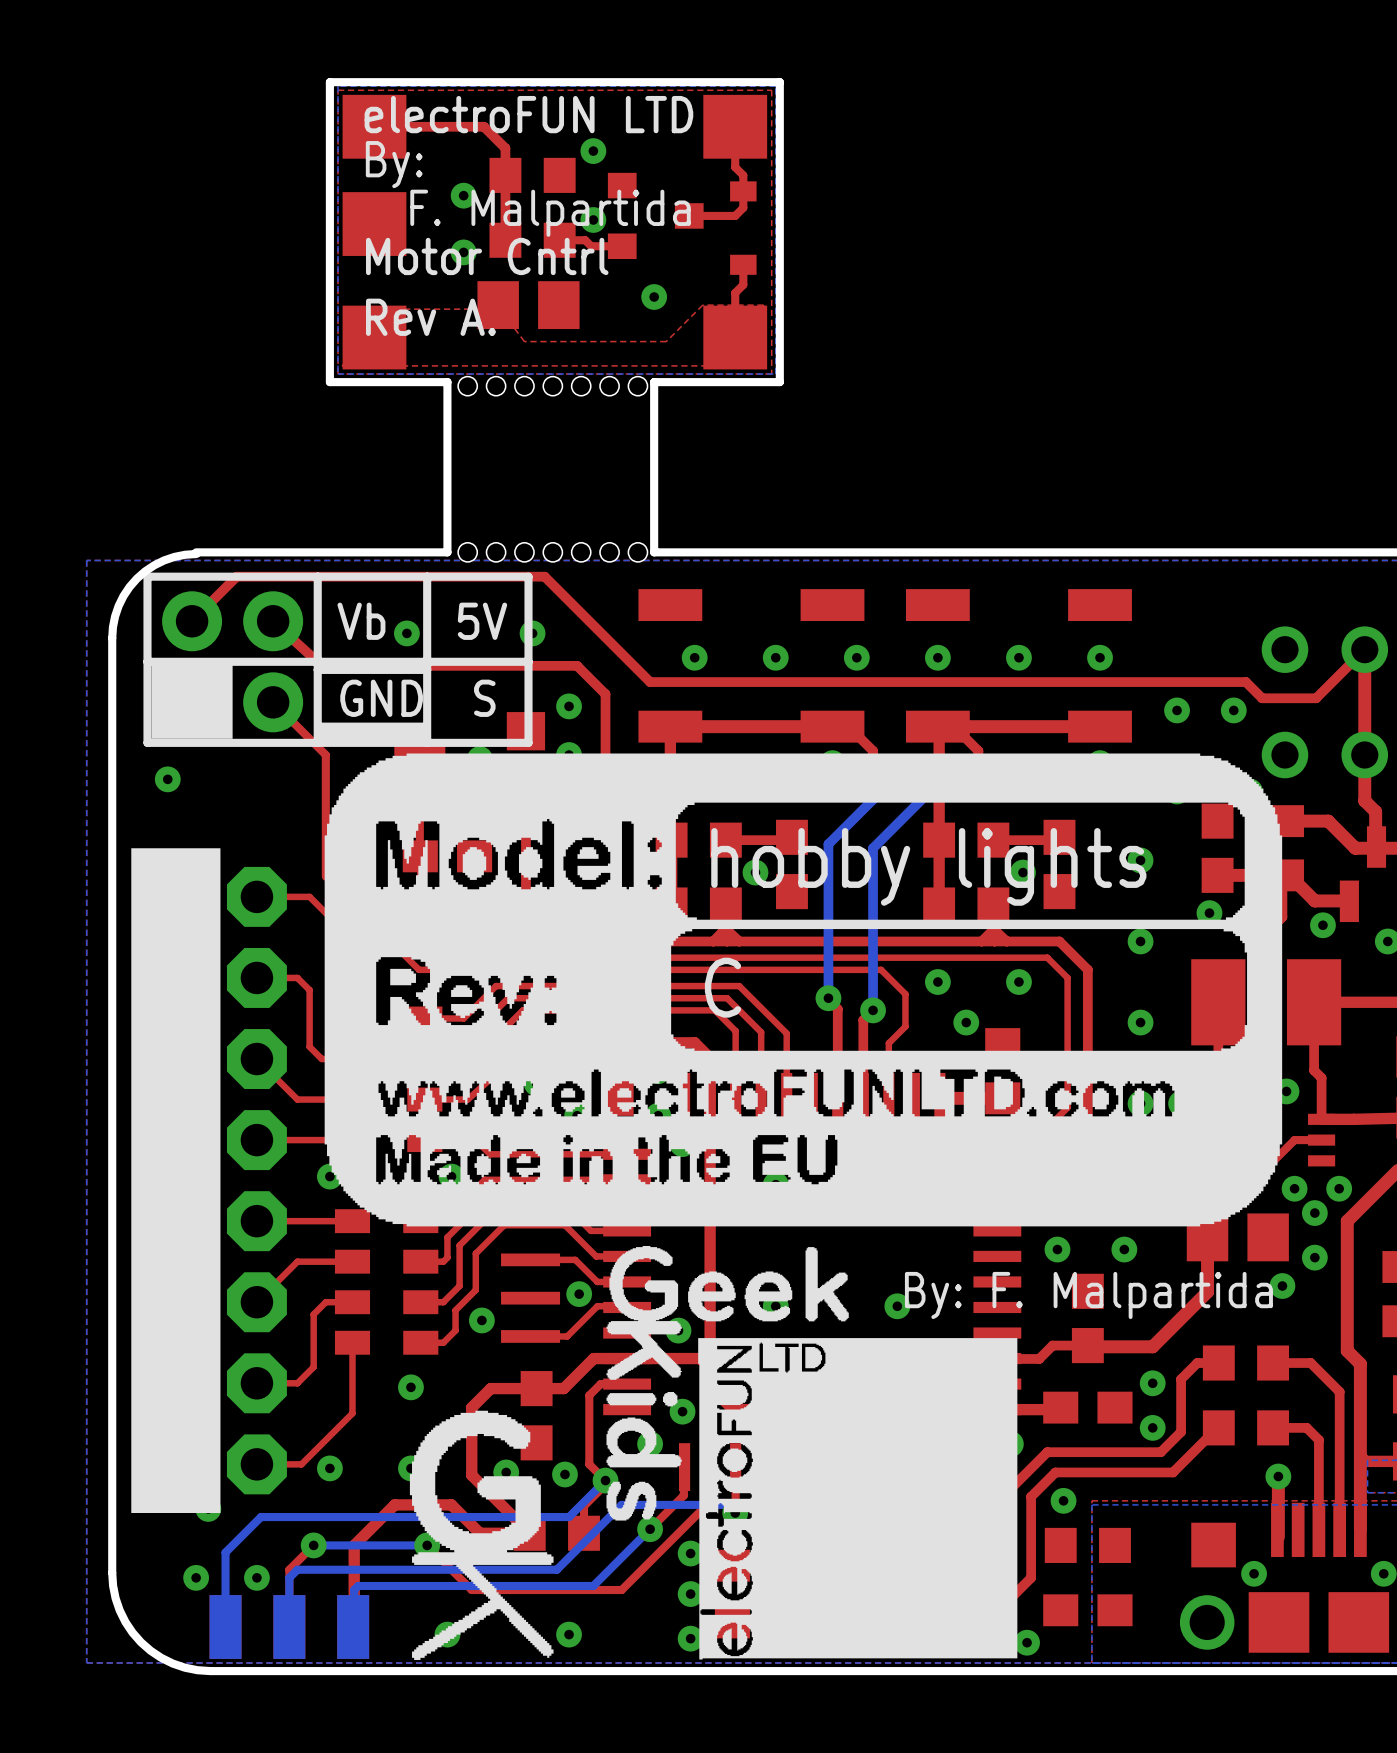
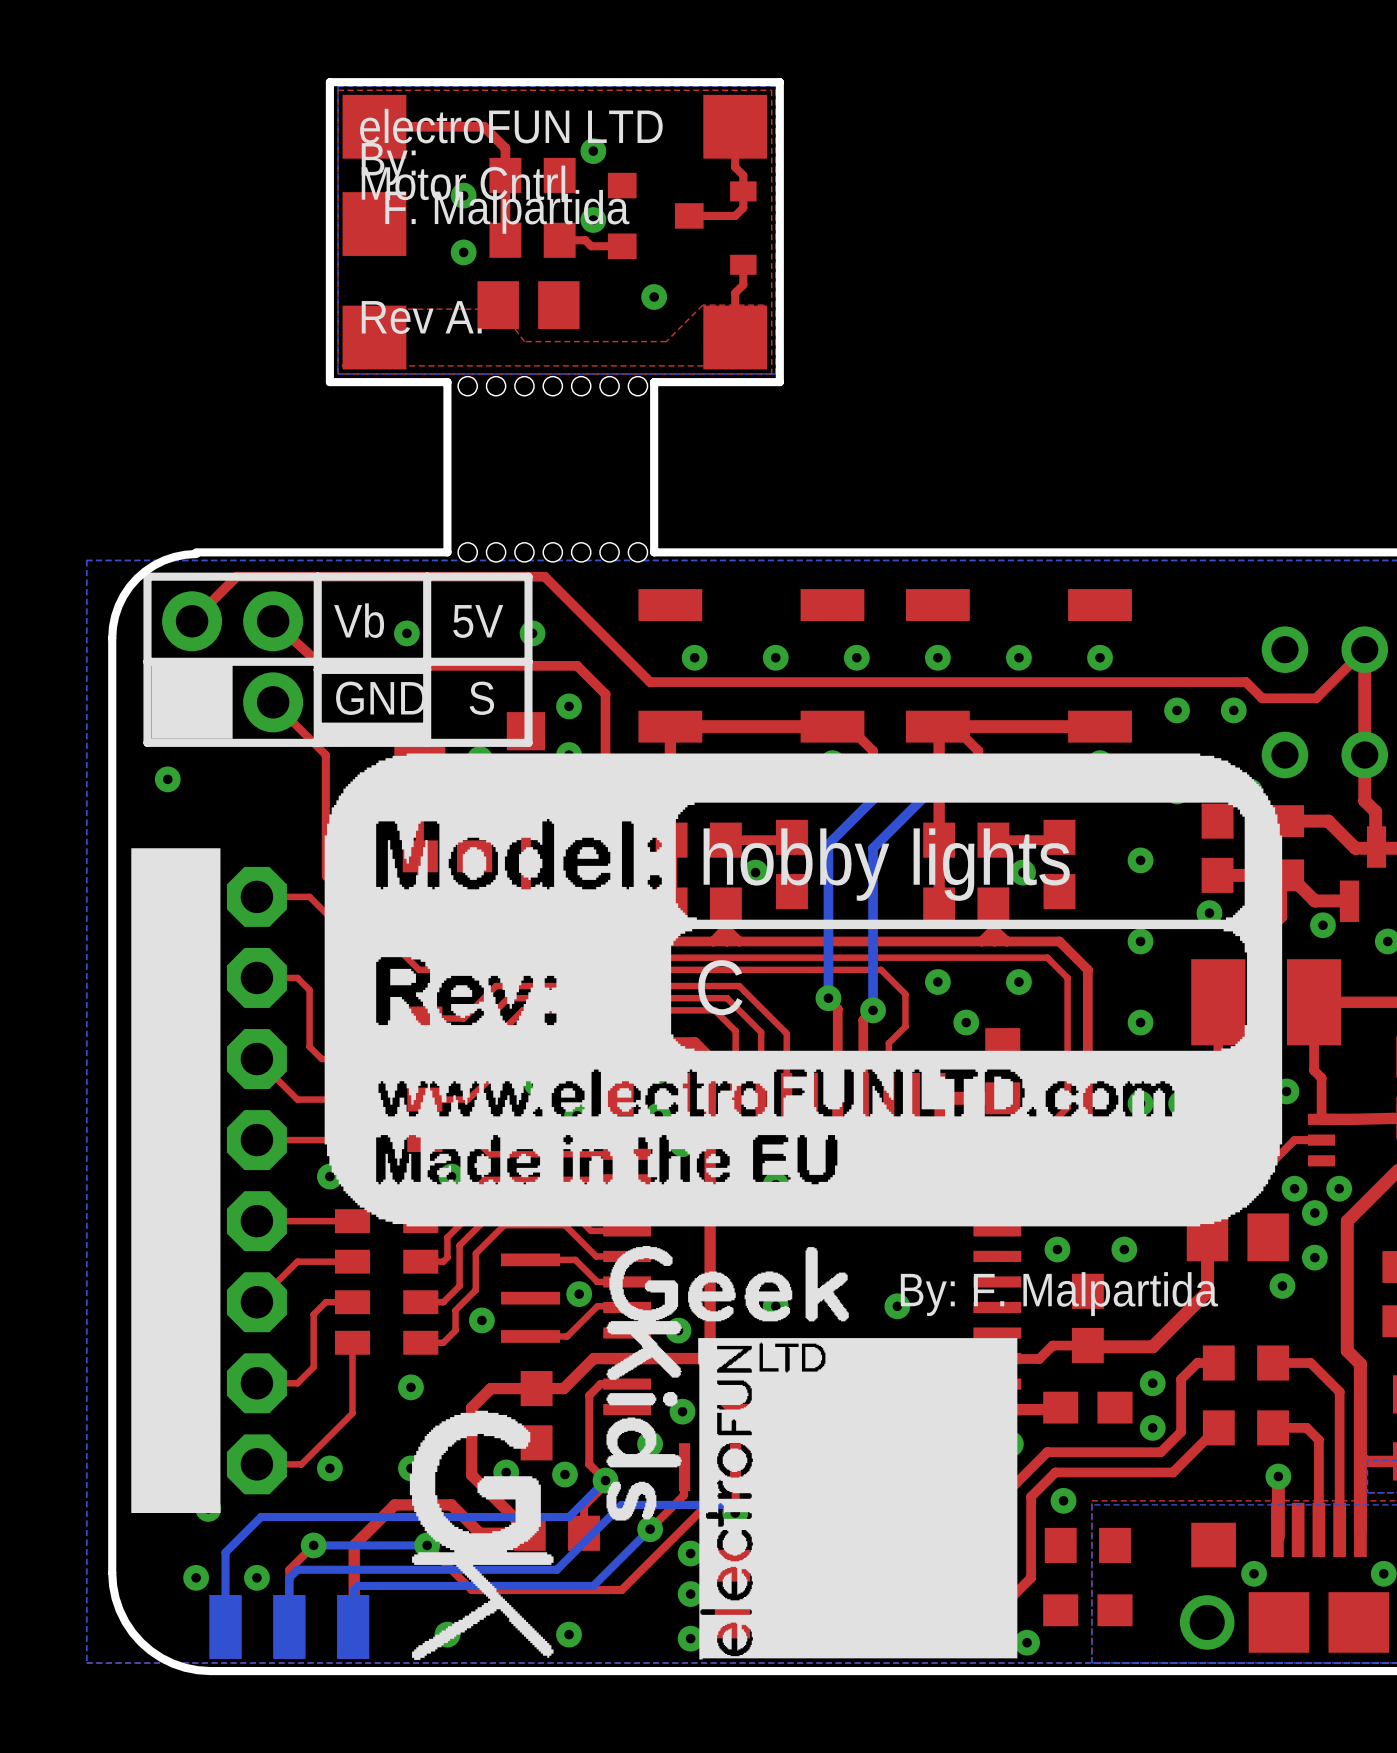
text position: electroFUN LTD (528, 114) -> electroFUN LTD (511, 126)
text position: Motor Cntrl (487, 256) -> Motor Cntrl (463, 182)

